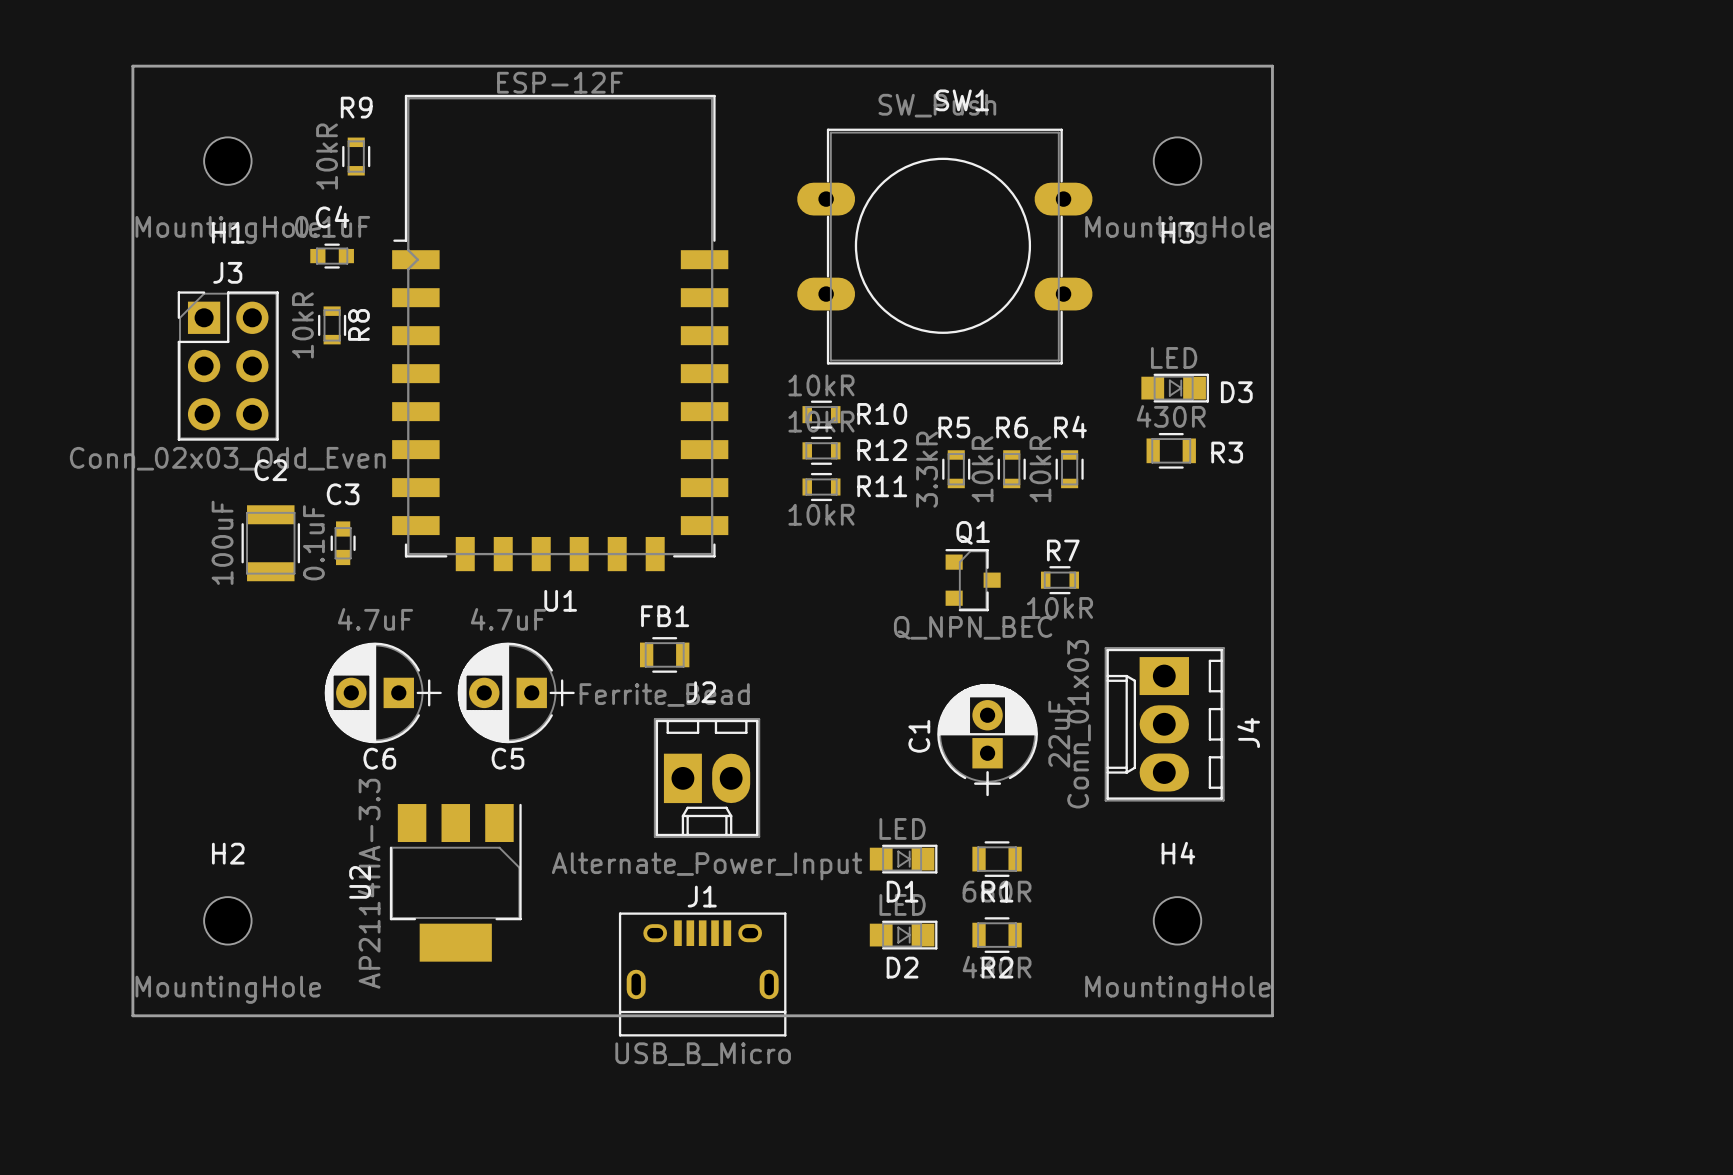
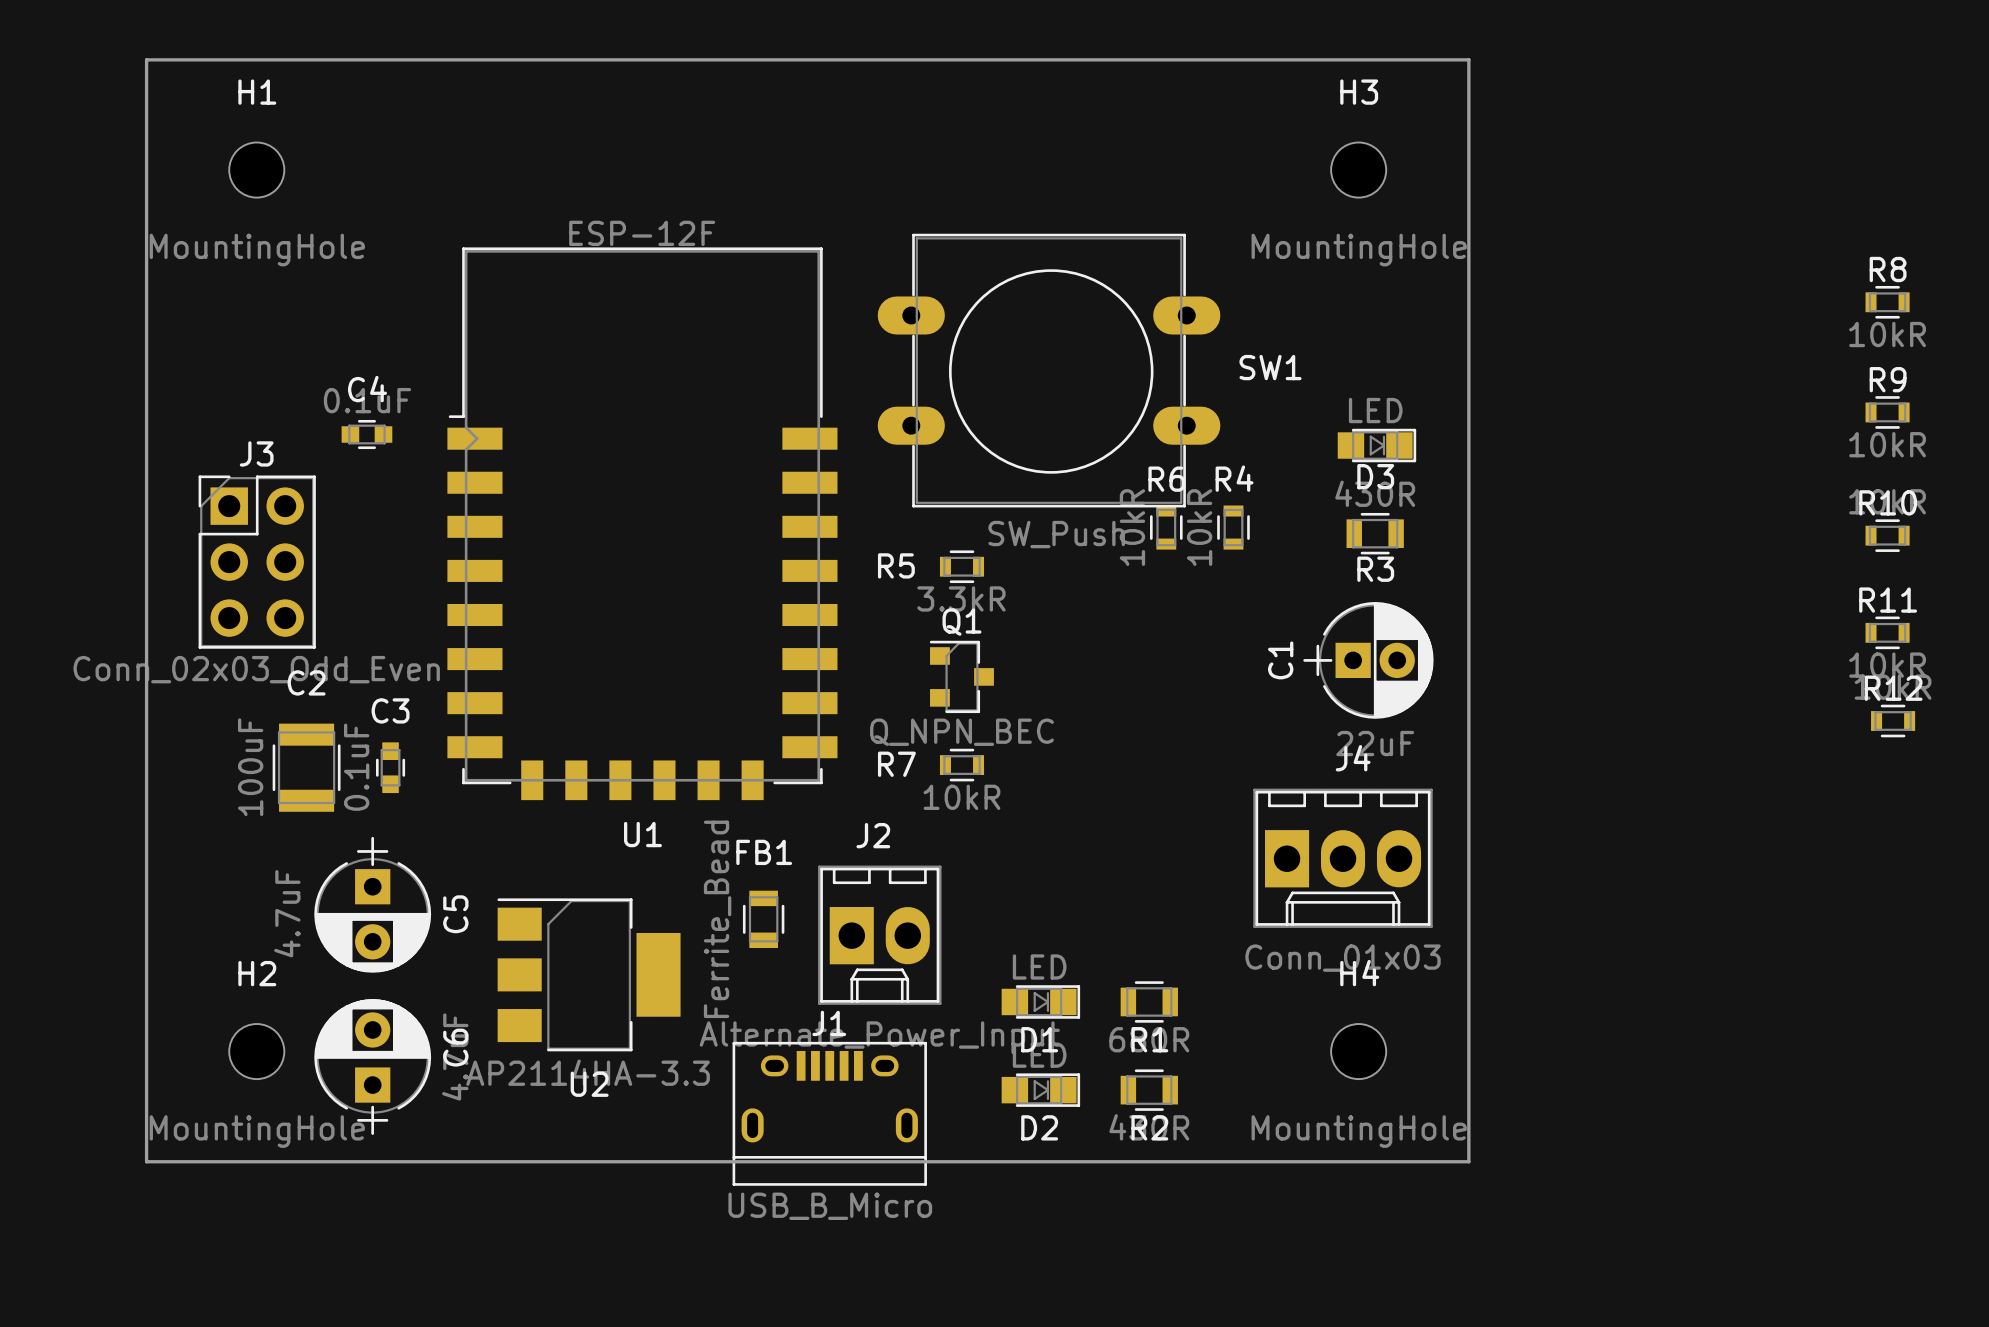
SW1 name position: SW1 (962, 100) -> SW1 (1270, 367)
R9 value position: 10kR (327, 156) -> 10kR (1887, 444)
R9 rotation: 0° (356, 156) -> 90° clockwise (1887, 412)
R9 position: (356, 156) -> (1887, 412)
H1 name position: H1 (228, 232) -> H1 (257, 92)
H3 name position: H3 (1177, 232) -> H3 (1359, 92)
SW1 rotation: 0° (944, 246) -> 180° (1049, 370)
C4 position: (332, 256) -> (366, 434)
R8 name position: R8 (358, 324) -> R8 (1888, 269)
R8 value position: 10kR (302, 325) -> 10kR (1887, 334)
R8 rotation: 0° (332, 325) -> 90° clockwise (1887, 302)
R8 position: (332, 325) -> (1887, 302)
U1 position: (560, 332) -> (642, 523)
J3 position: (228, 366) -> (257, 562)
D3 position: (1175, 388) -> (1376, 445)
D3 name position: D3 (1236, 392) -> D3 (1375, 476)
R10 name position: R10 (882, 413) -> R10 (1888, 502)
R10 position: (821, 414) -> (1887, 535)
R5 name position: R5 (954, 427) -> R5 (896, 565)
R12 position: (821, 450) -> (1893, 720)
R12 name position: R12 (882, 450) -> R12 (1893, 688)
R3 position: (1171, 450) -> (1375, 533)
R3 name position: R3 (1227, 452) -> R3 (1375, 569)
R5 value position: 3.3kR (927, 469) -> 3.3kR (961, 598)
R5 rotation: 0° (956, 469) -> 90° clockwise (961, 566)
R5 position: (956, 469) -> (961, 566)
R11 name position: R11 (882, 486) -> R11 (1888, 600)
R11 position: (821, 487) -> (1887, 632)
C2 position: (270, 543) -> (306, 767)
C3 position: (343, 543) -> (390, 767)
R7 name position: R7 (1063, 550) -> R7 (896, 764)
Q1 position: (973, 580) -> (961, 676)
R7 position: (1059, 580) -> (961, 765)
FB1 rotation: 0° (664, 654) -> 90° clockwise (763, 919)
FB1 position: (664, 654) -> (763, 919)
C6 rotation: 0° (383, 692) -> 90° clockwise (372, 1066)
C6 position: (383, 692) -> (372, 1066)
C5 rotation: 0° (516, 692) -> 90° counterclockwise (372, 904)
C5 position: (516, 692) -> (372, 904)
J4 rotation: 0° (1164, 724) -> 90° counterclockwise (1343, 858)
C1 rotation: 0° (987, 740) -> 90° clockwise (1368, 660)
C1 position: (987, 740) -> (1368, 660)
C6 name position: C6 (379, 758) -> C6 (455, 1047)
J2 position: (707, 778) -> (879, 935)
D1 position: (903, 859) -> (1040, 1001)
R1 position: (997, 859) -> (1149, 1001)
U2 rotation: 0° (455, 882) -> 90° counterclockwise (588, 974)
D2 position: (903, 935) -> (1040, 1090)
R2 position: (997, 935) -> (1149, 1090)
J1 position: (702, 974) -> (829, 1113)

